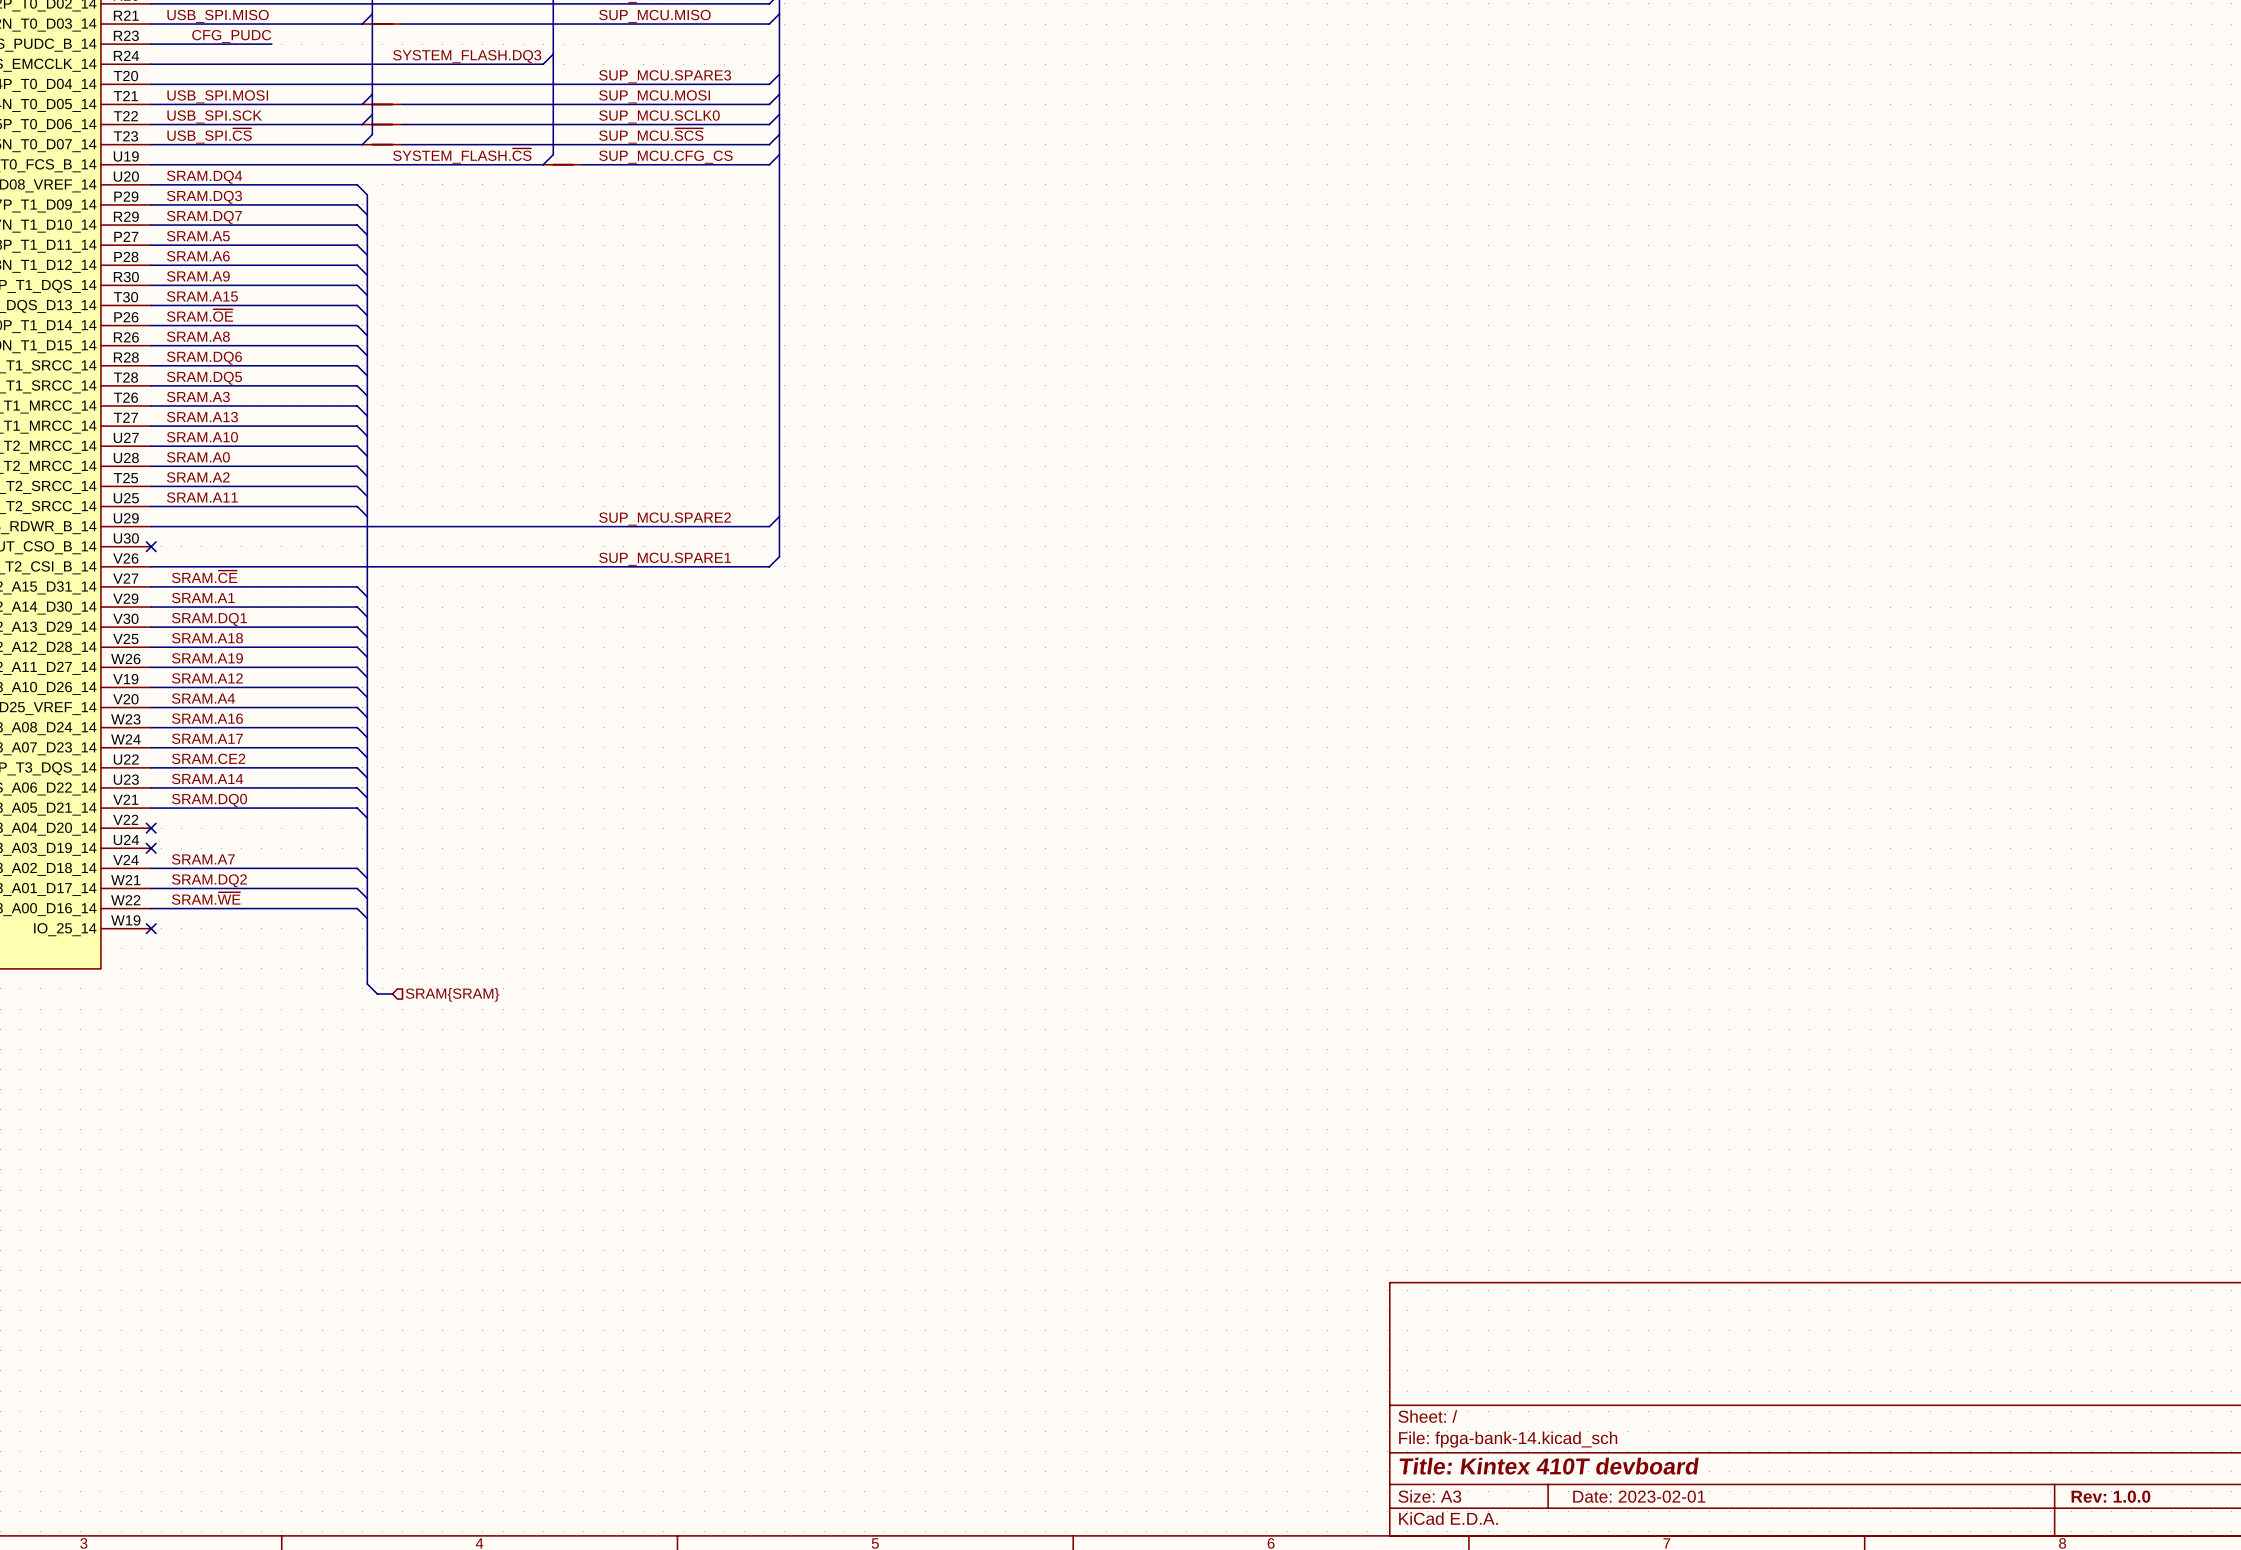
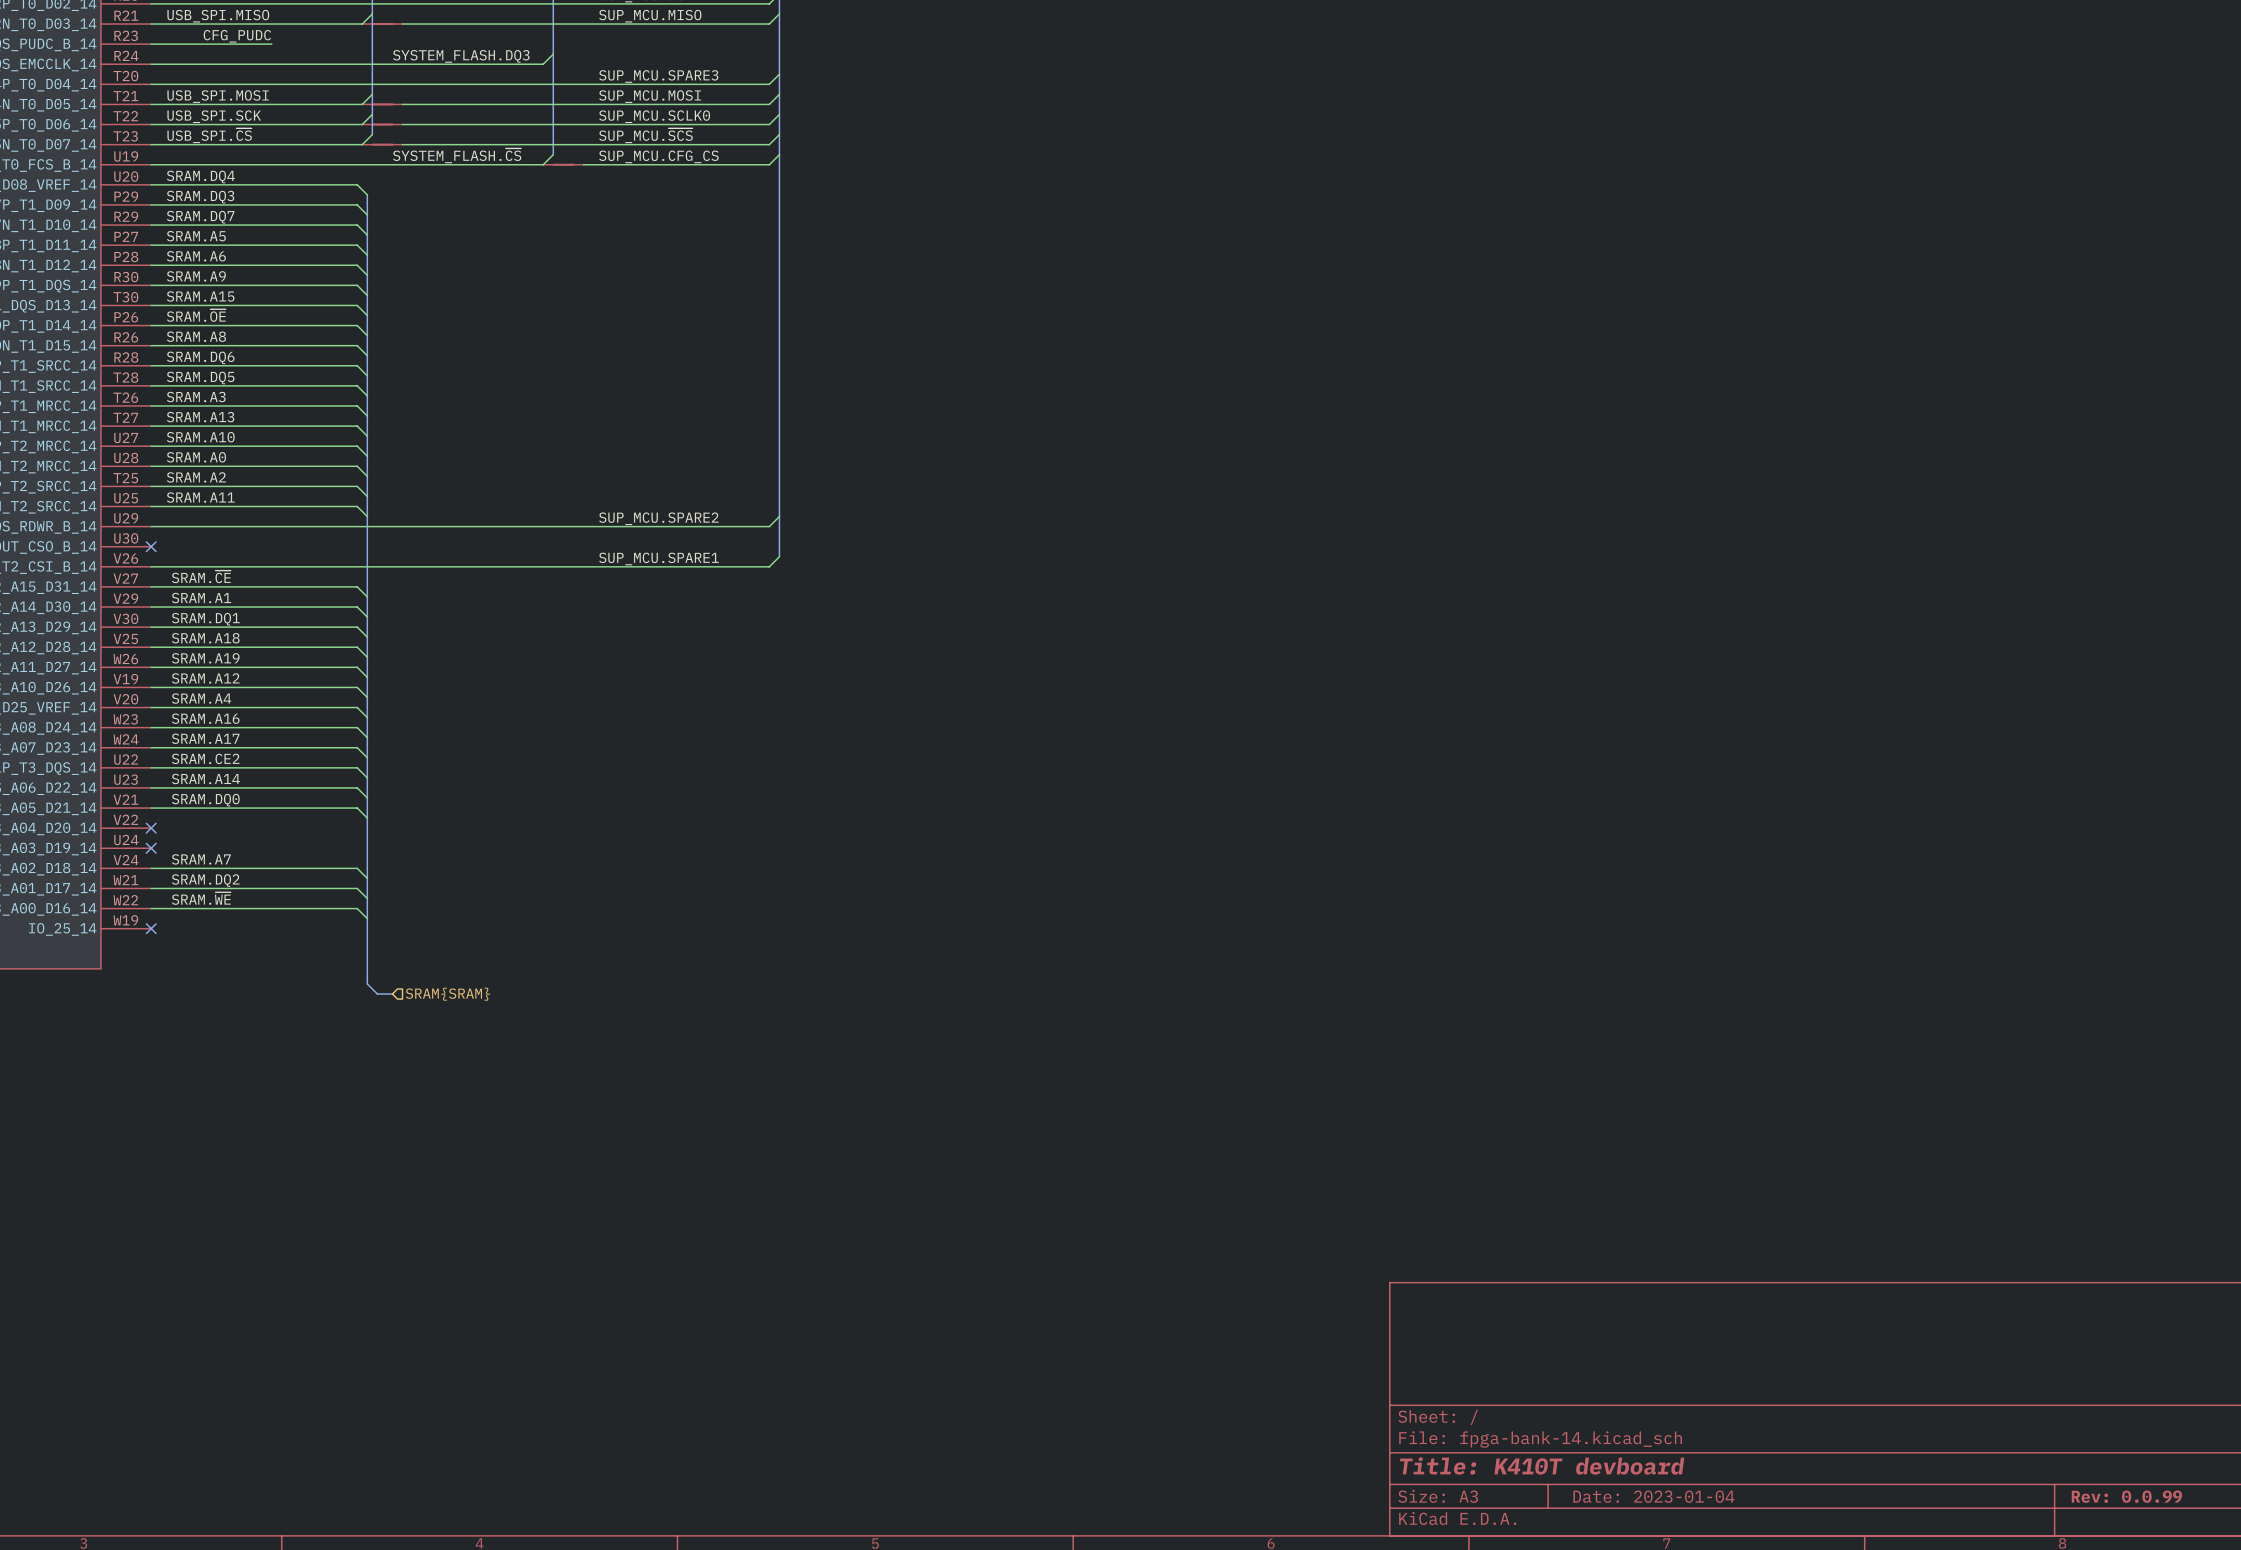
title block: Title: Kintex 410T devboard (1549, 1466) -> Title: K410T devboard (1542, 1465)
title block: Date: 2023-02-01 (1639, 1496) -> Date: 2023-01-04 (1653, 1496)
title block: Rev: 1.0.0 (2110, 1496) -> Rev: 0.0.99 (2126, 1496)

